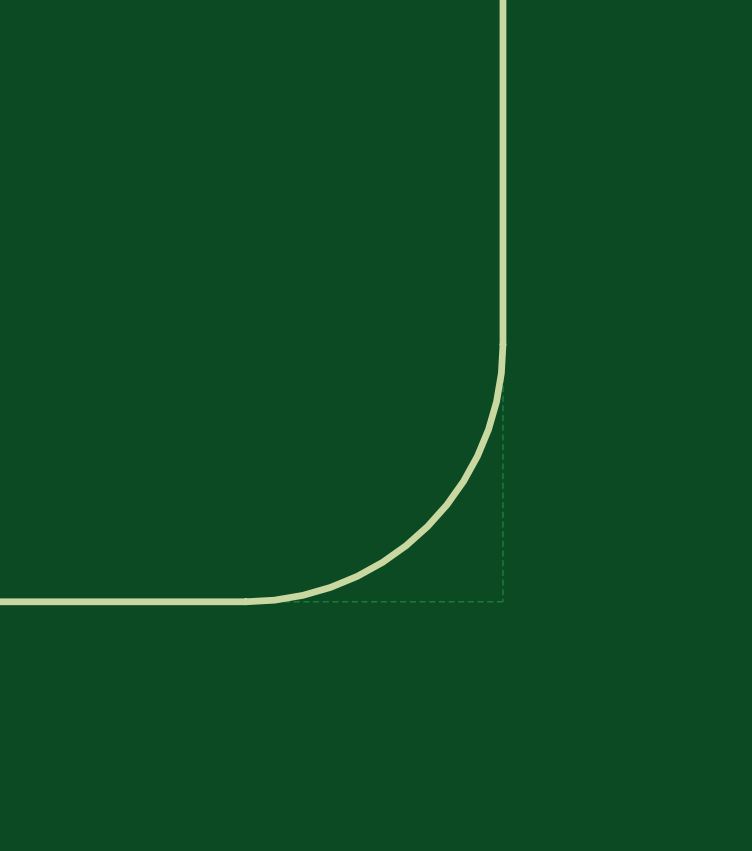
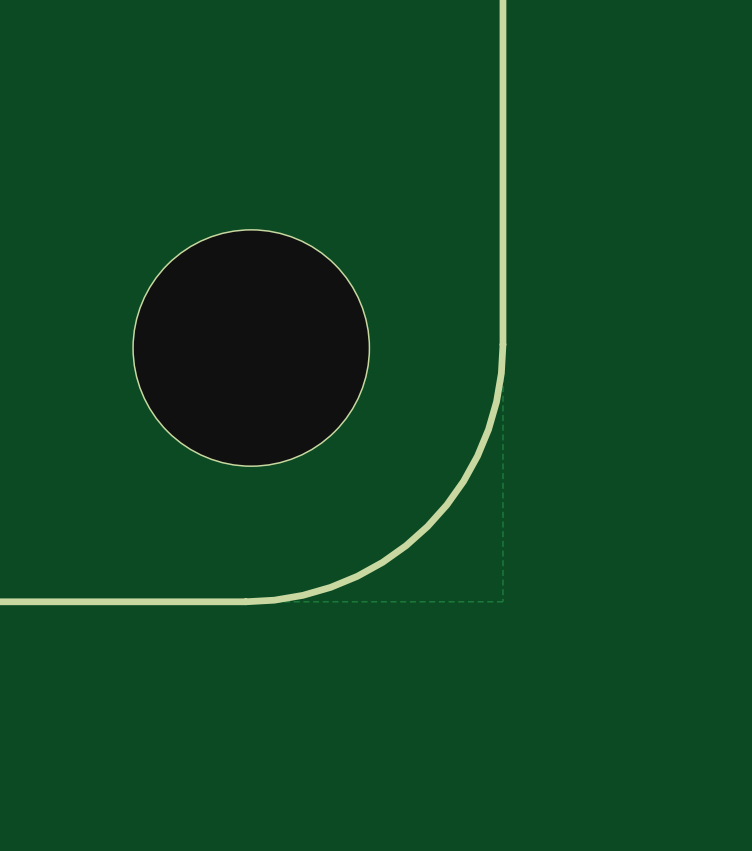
part: none -> (251, 348)

